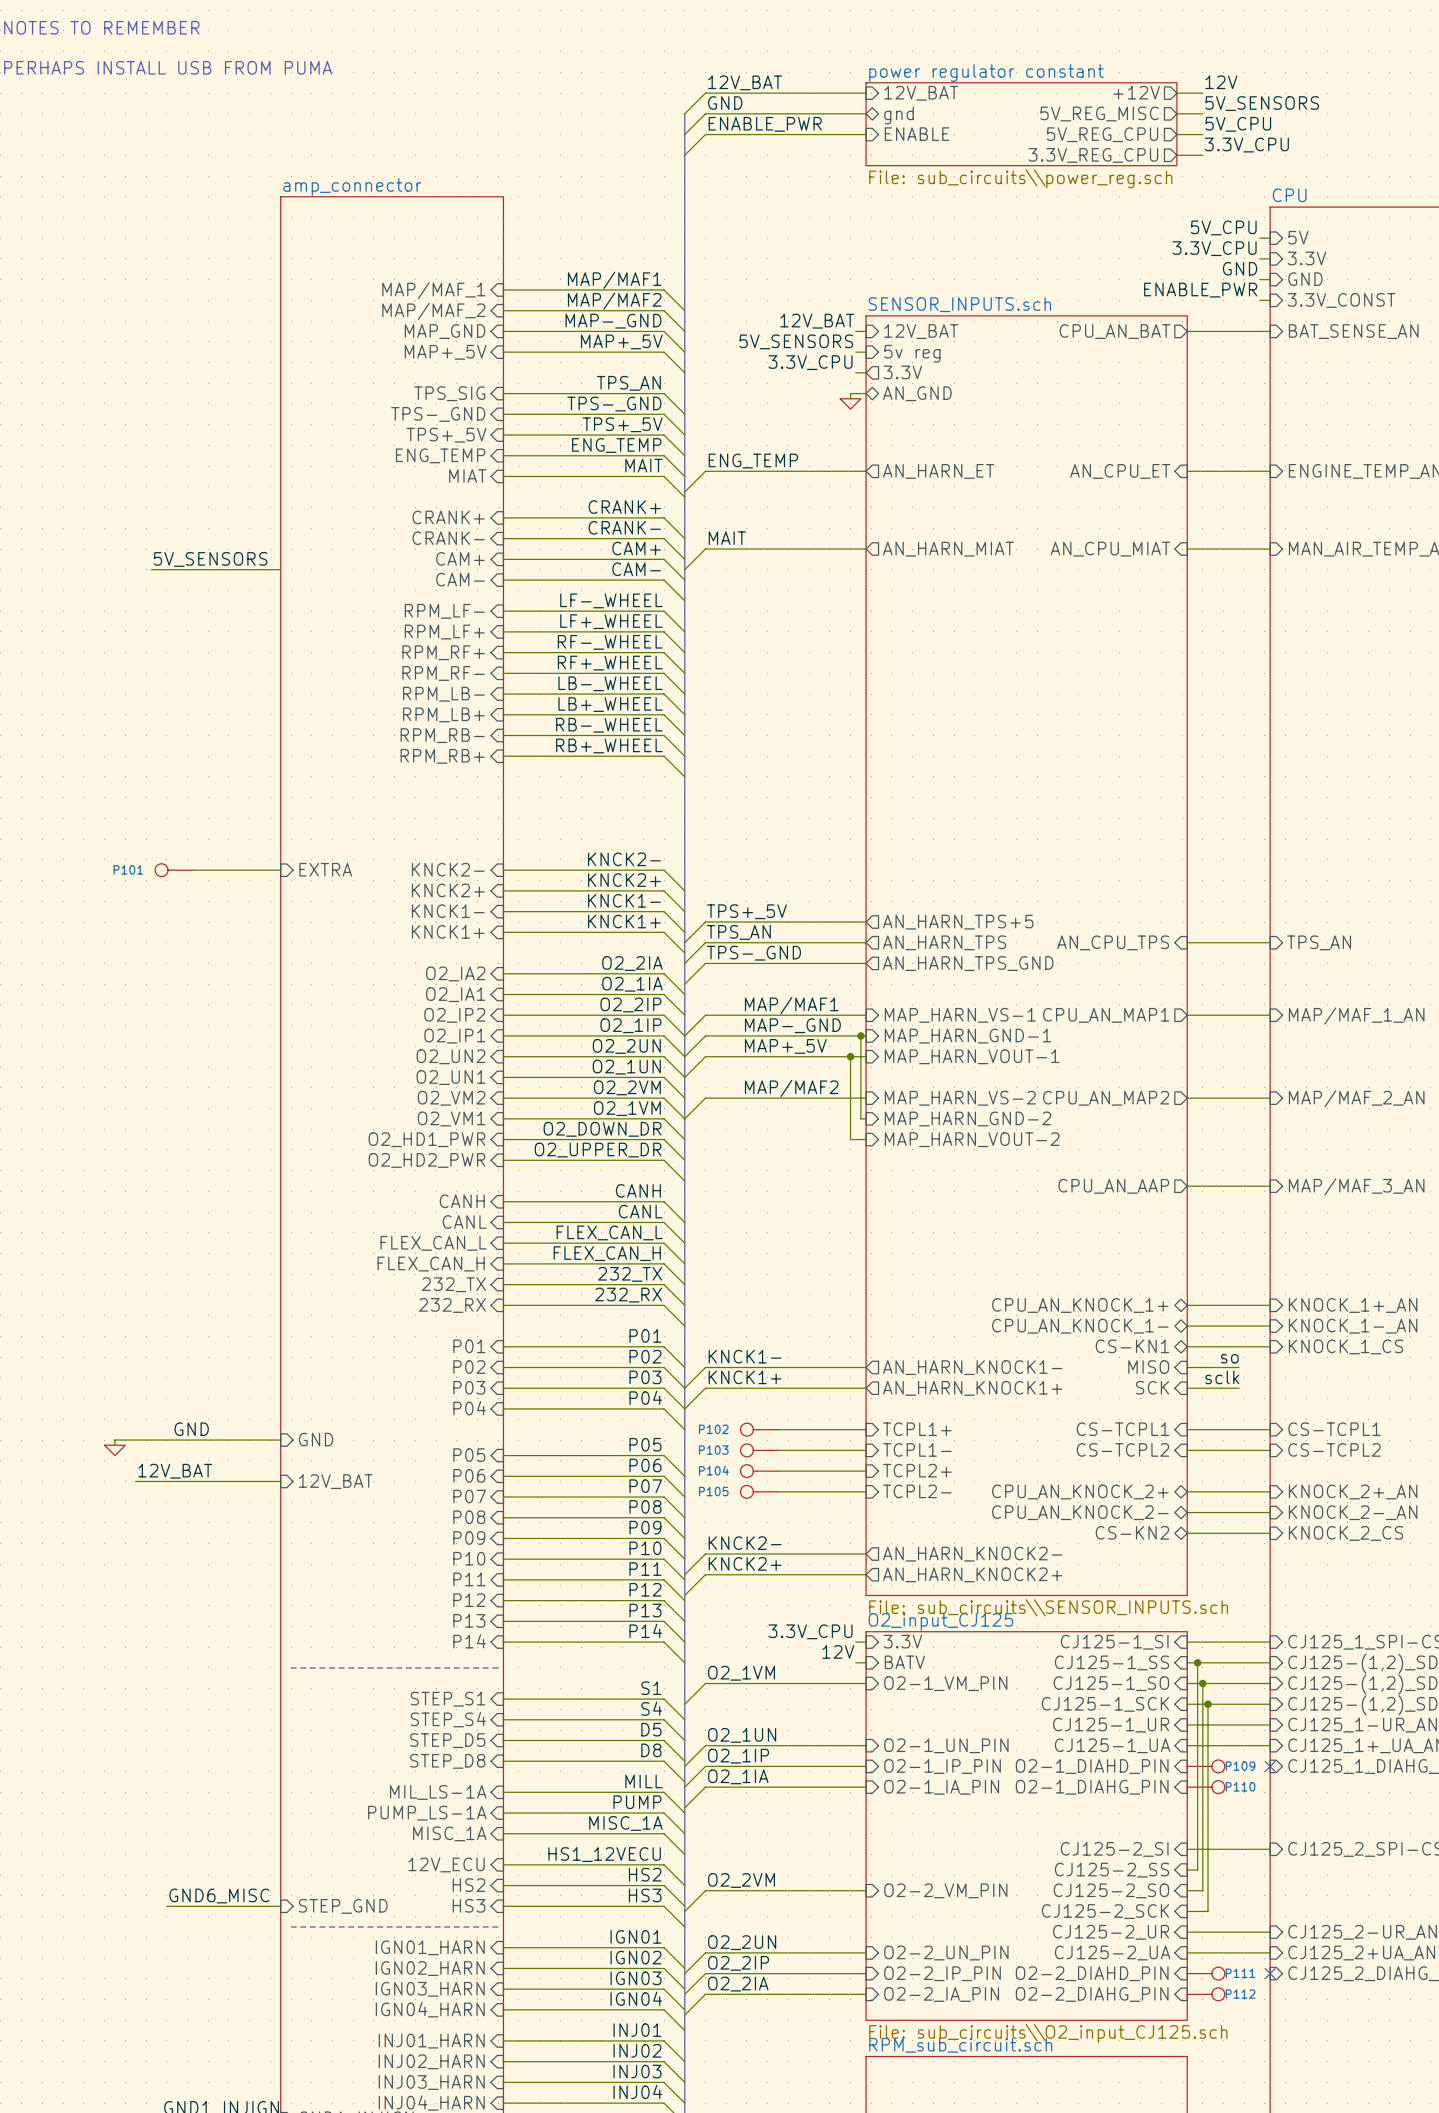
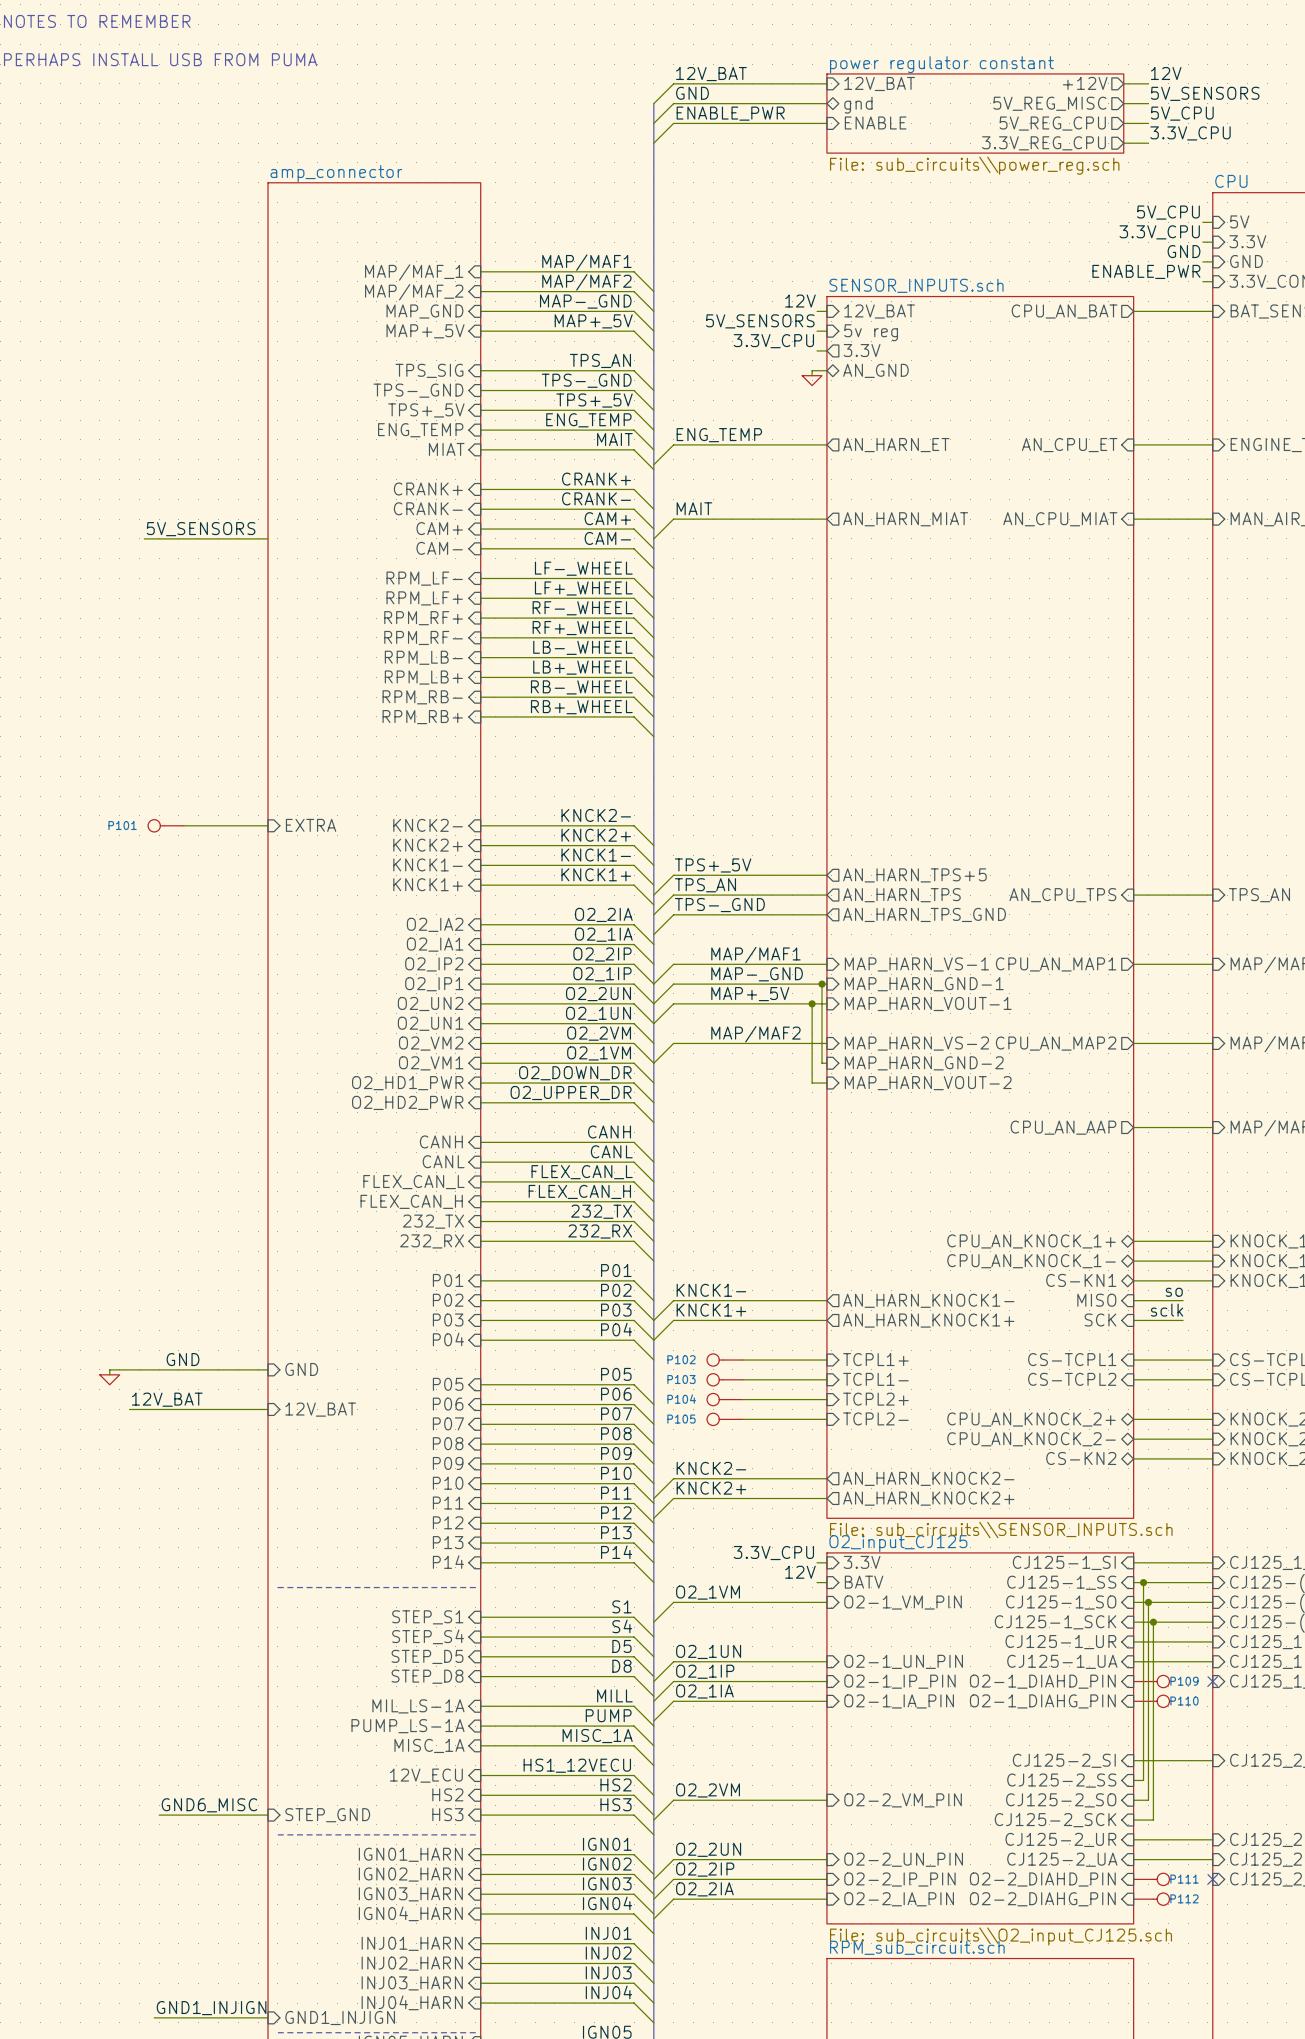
label: 12V_BAT (817, 321) -> 12V (800, 301)

